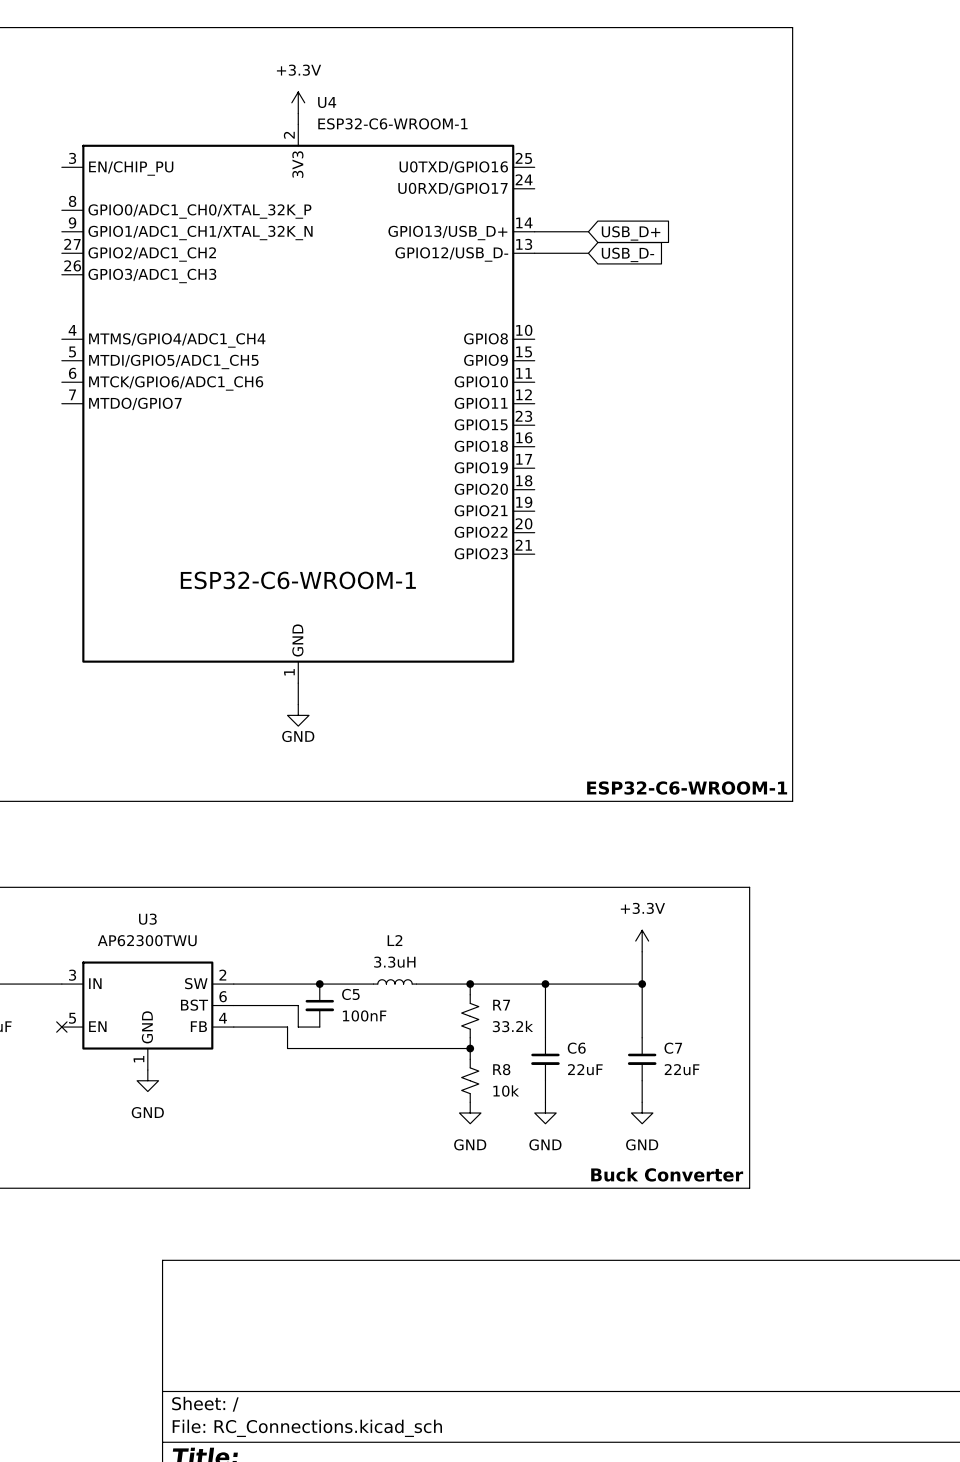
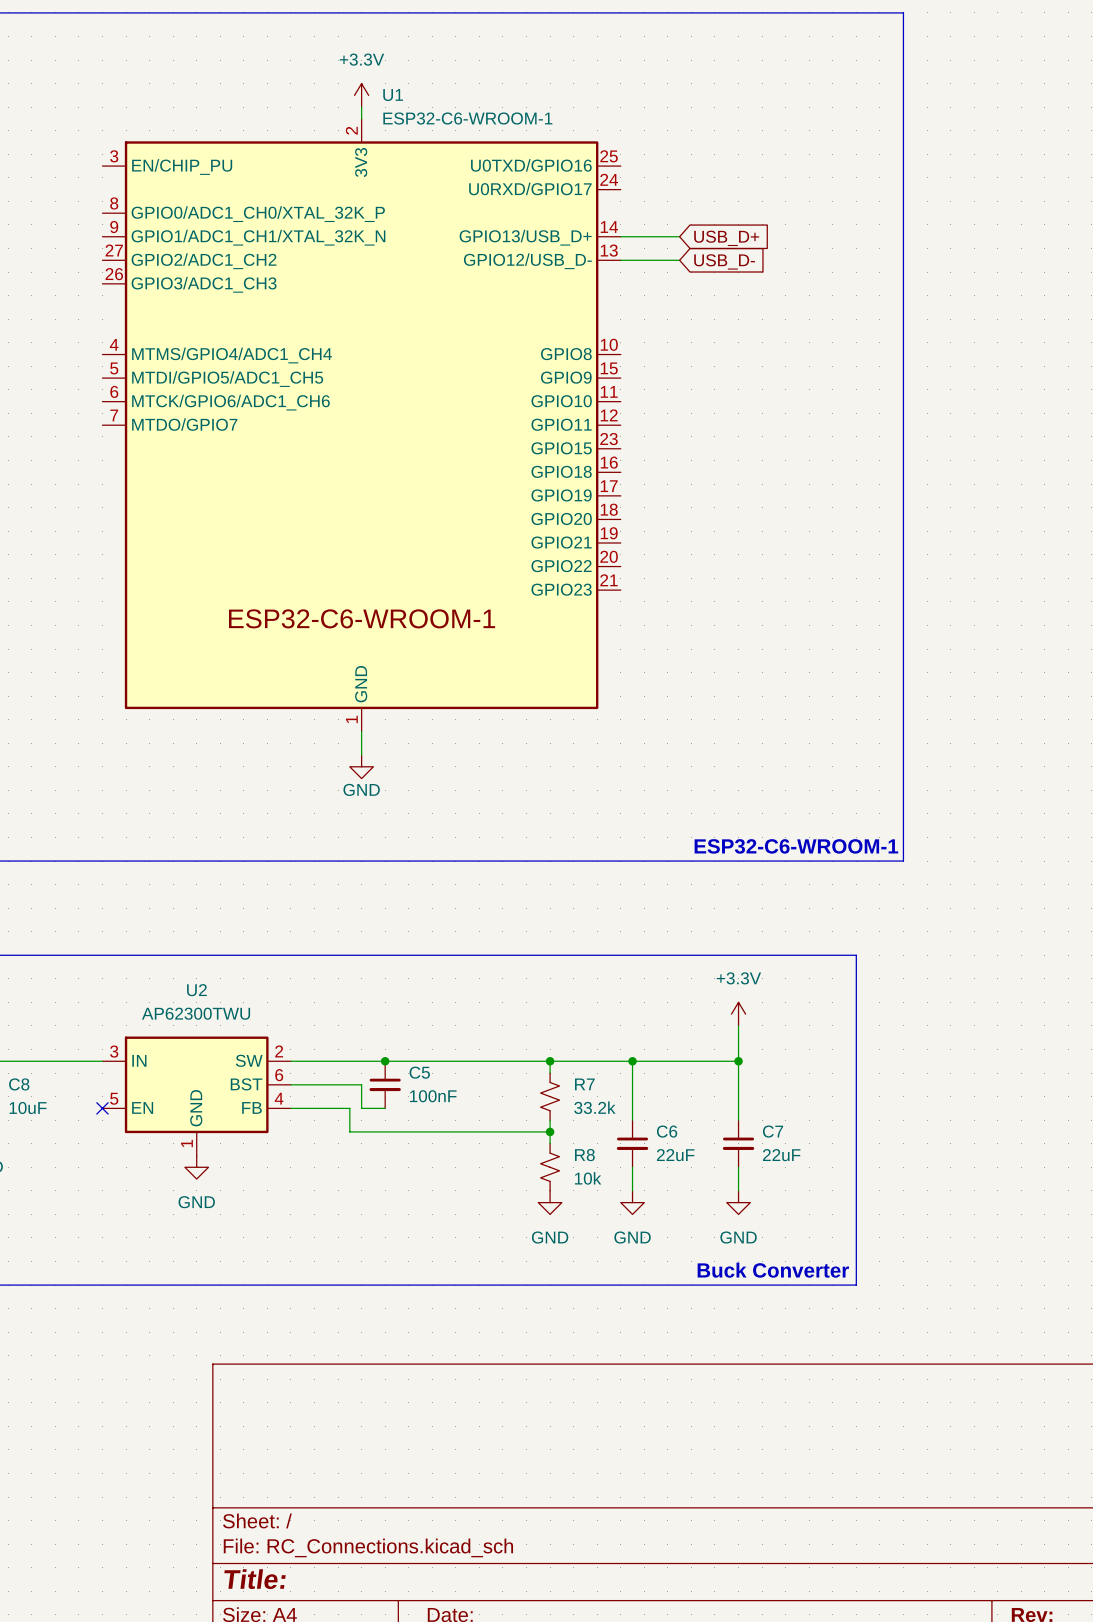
U4 name: U4 (327, 102) -> U1 (393, 95)
U3 name: U3 (147, 919) -> U2 (196, 990)
L2: 3.3uH (395, 981) -> none
wire: none -> (444, 1061) (491, 1061)

